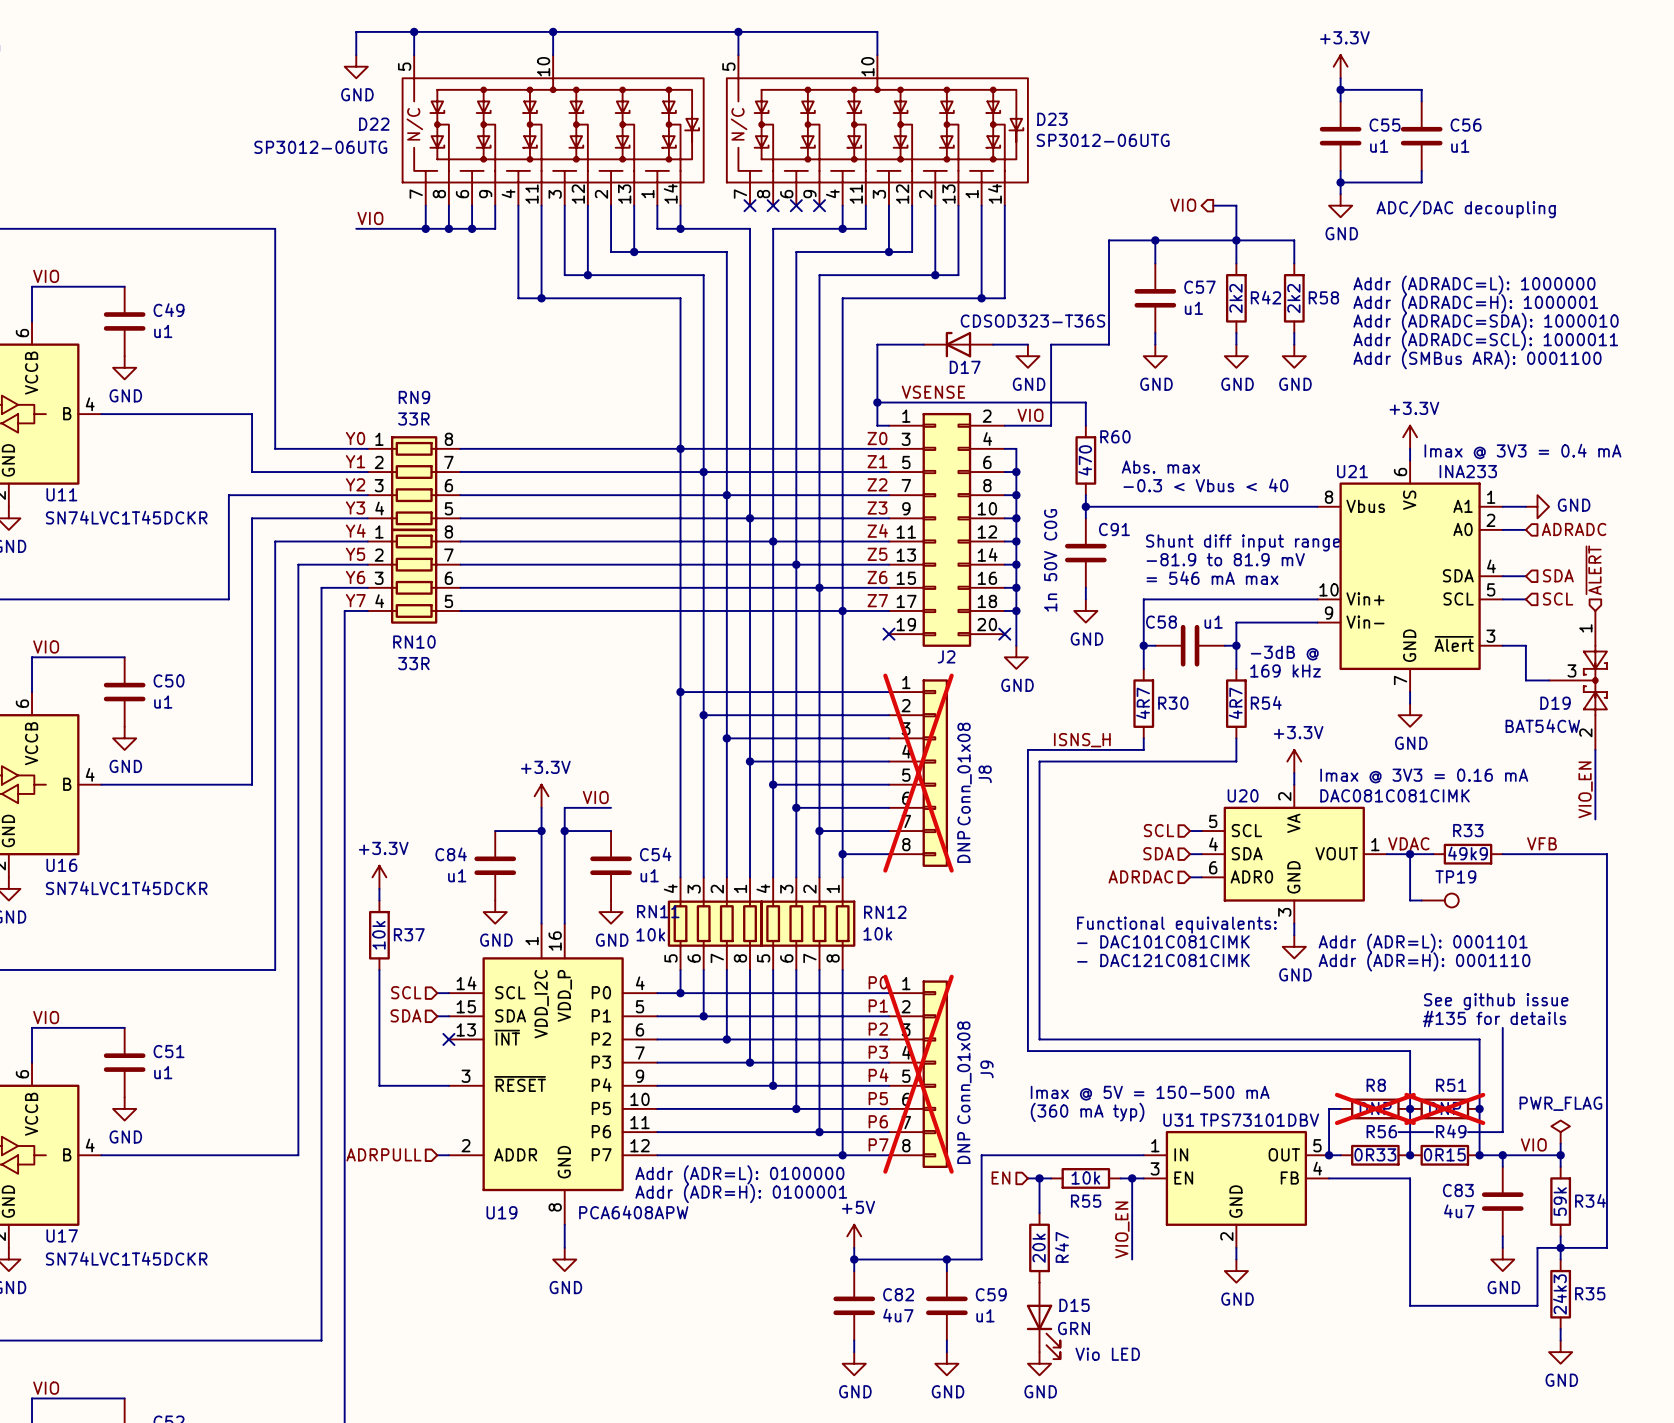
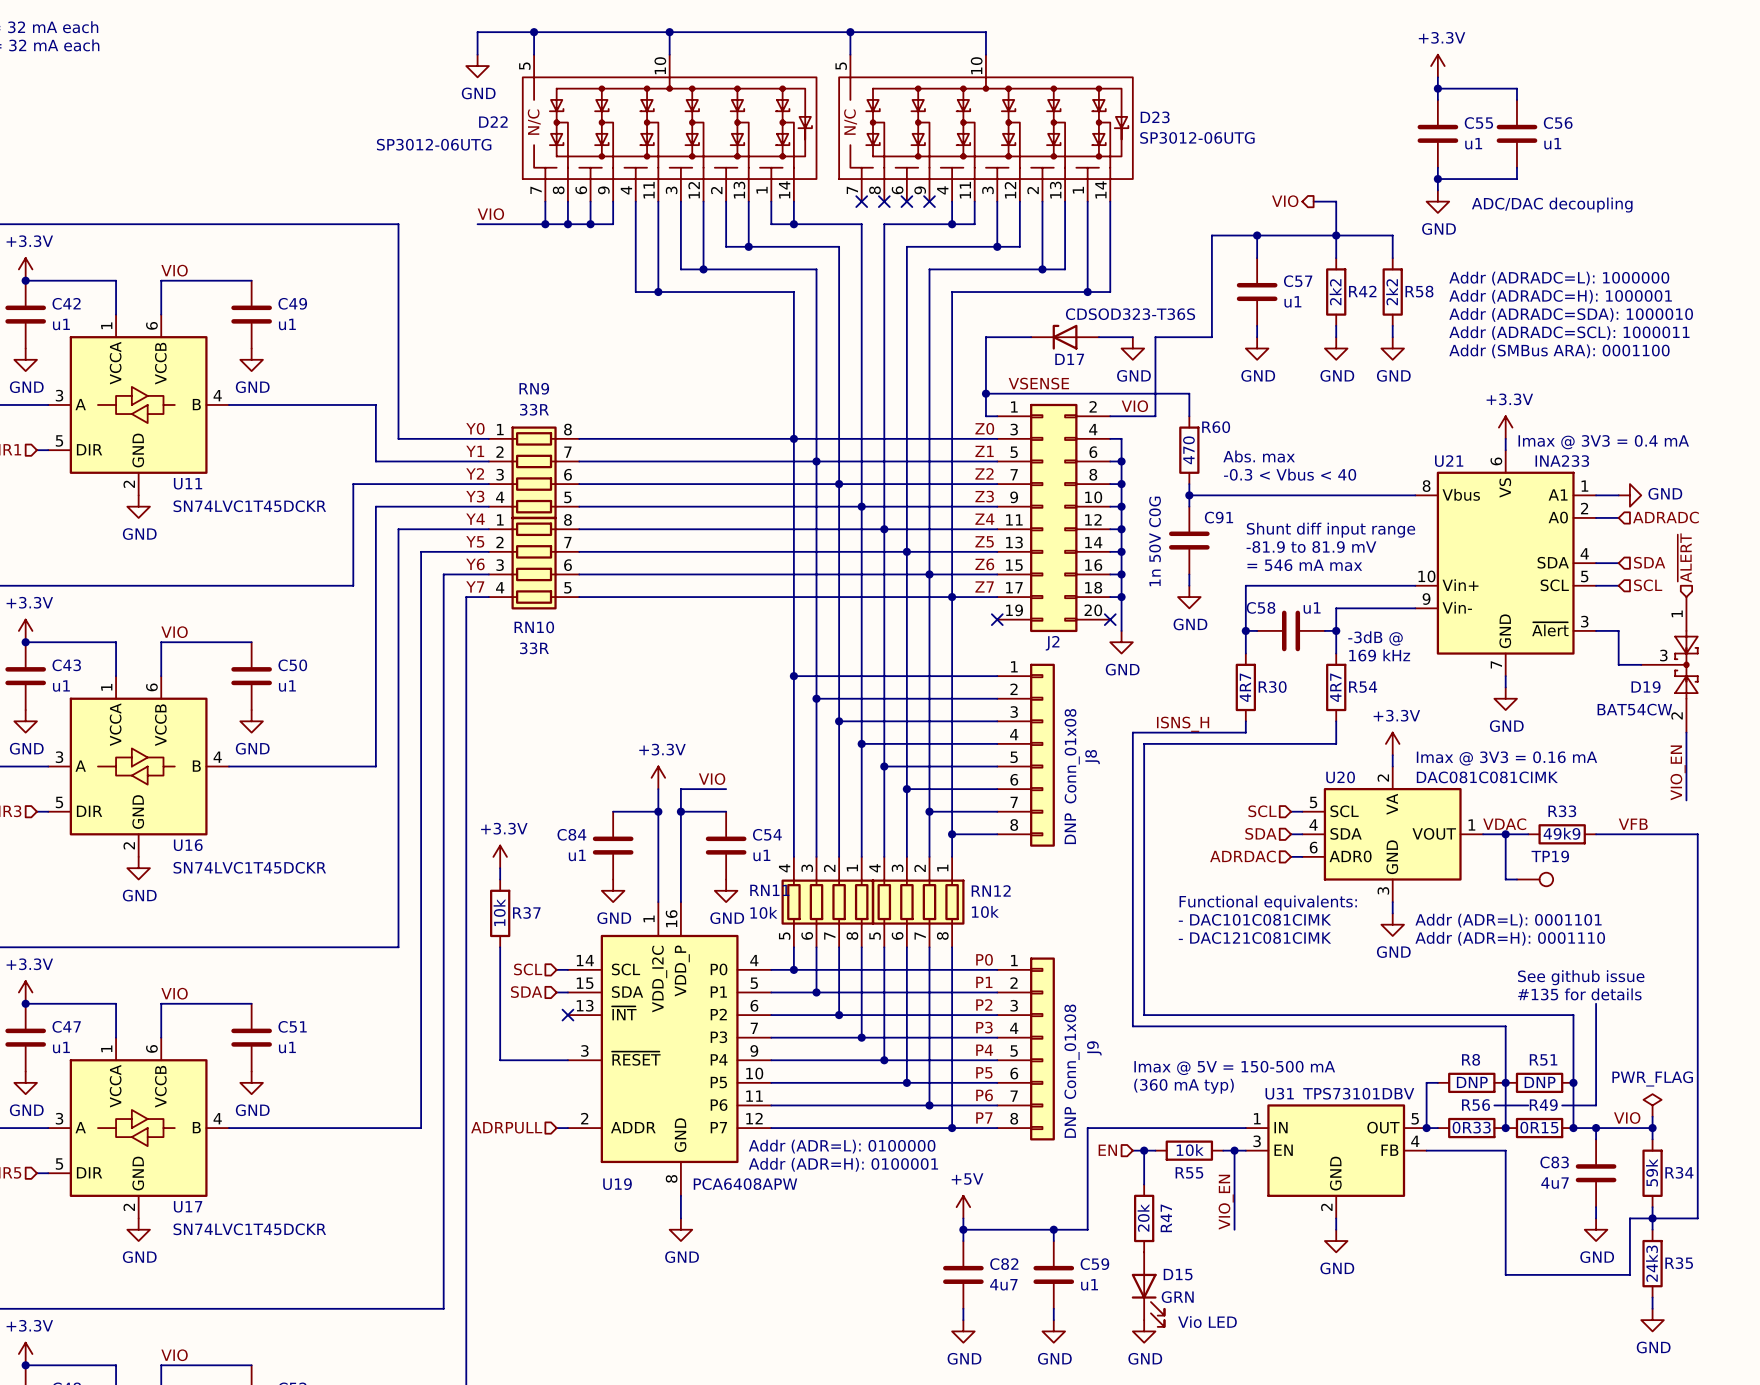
J8 do-not-place cross: (918, 773) -> none
J9 do-not-place cross: (918, 1074) -> none
R8 do-not-place cross: (1375, 1108) -> none
R51 do-not-place cross: (1444, 1108) -> none

